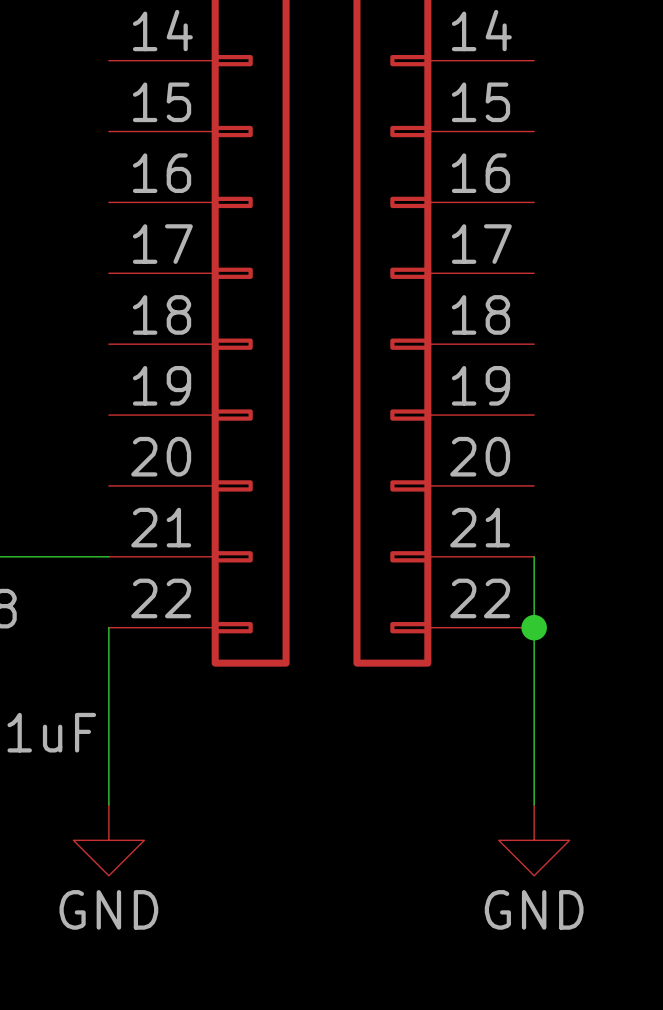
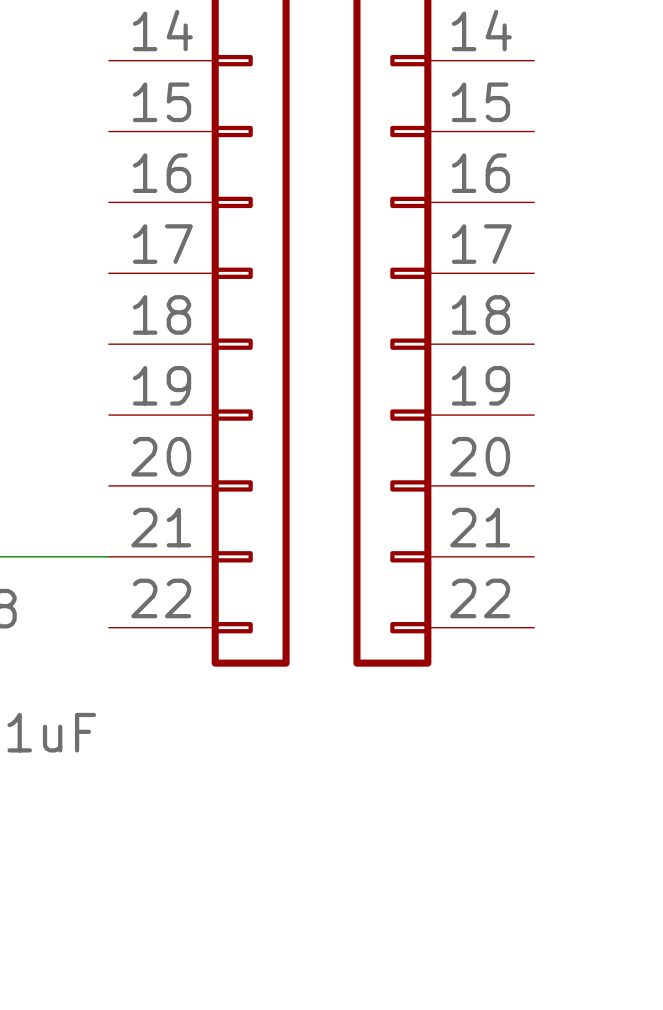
wire: (534, 556) (534, 804) -> none
wire: (108, 627) (108, 804) -> none
junction: (534, 627) -> none
power symbol: GND (108, 840) -> none
power symbol: GND (534, 840) -> none

